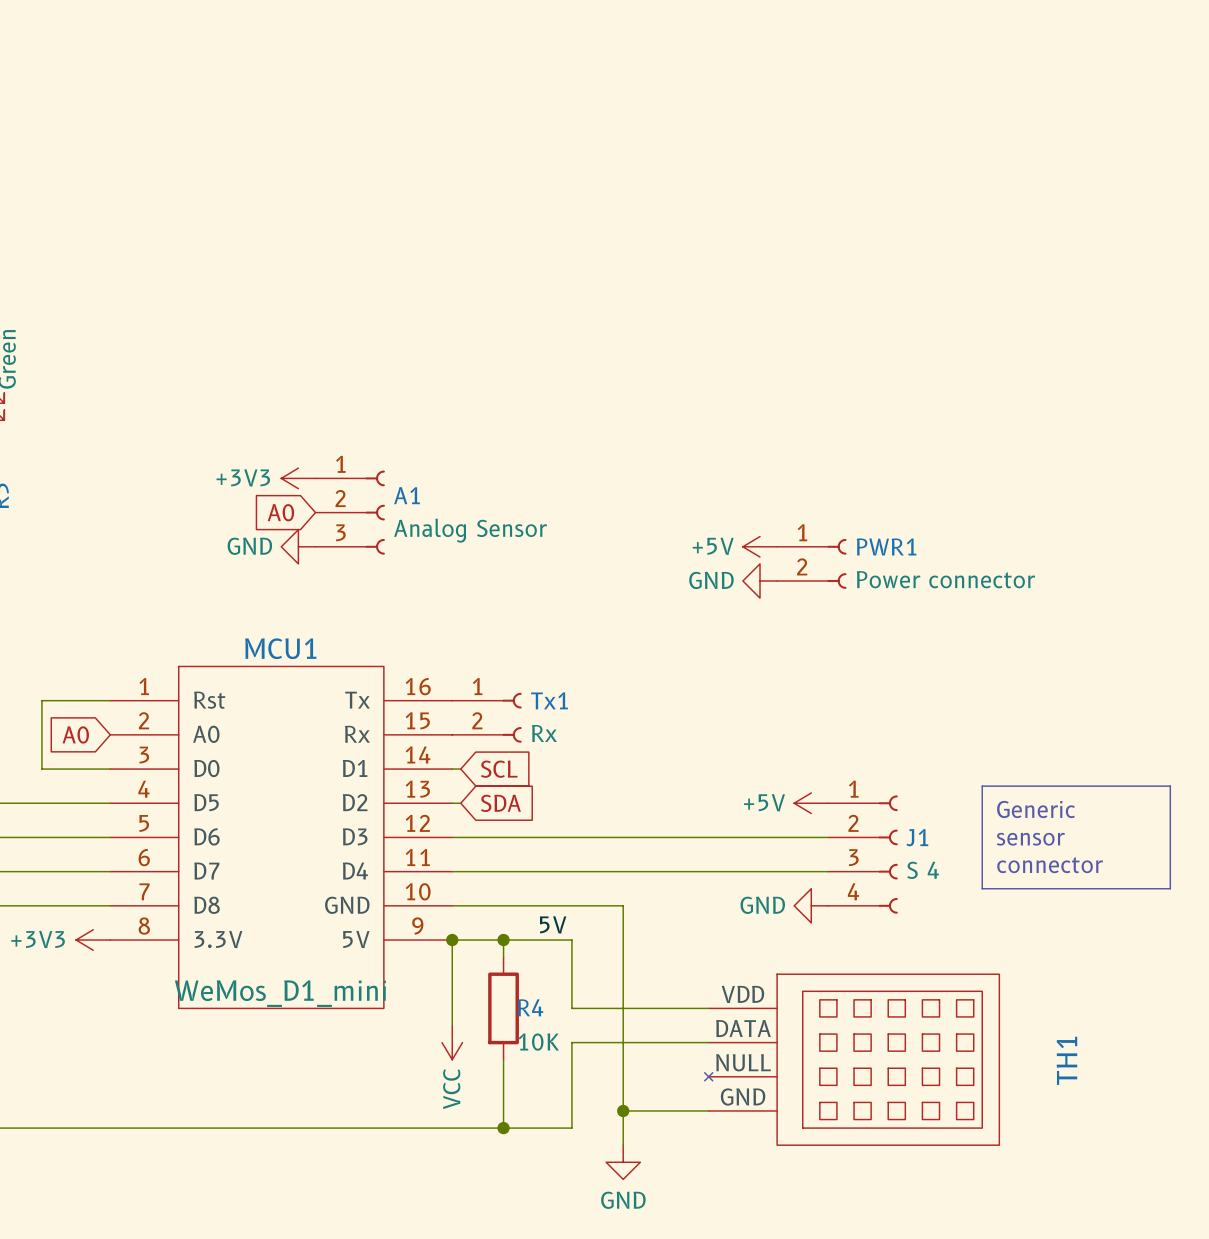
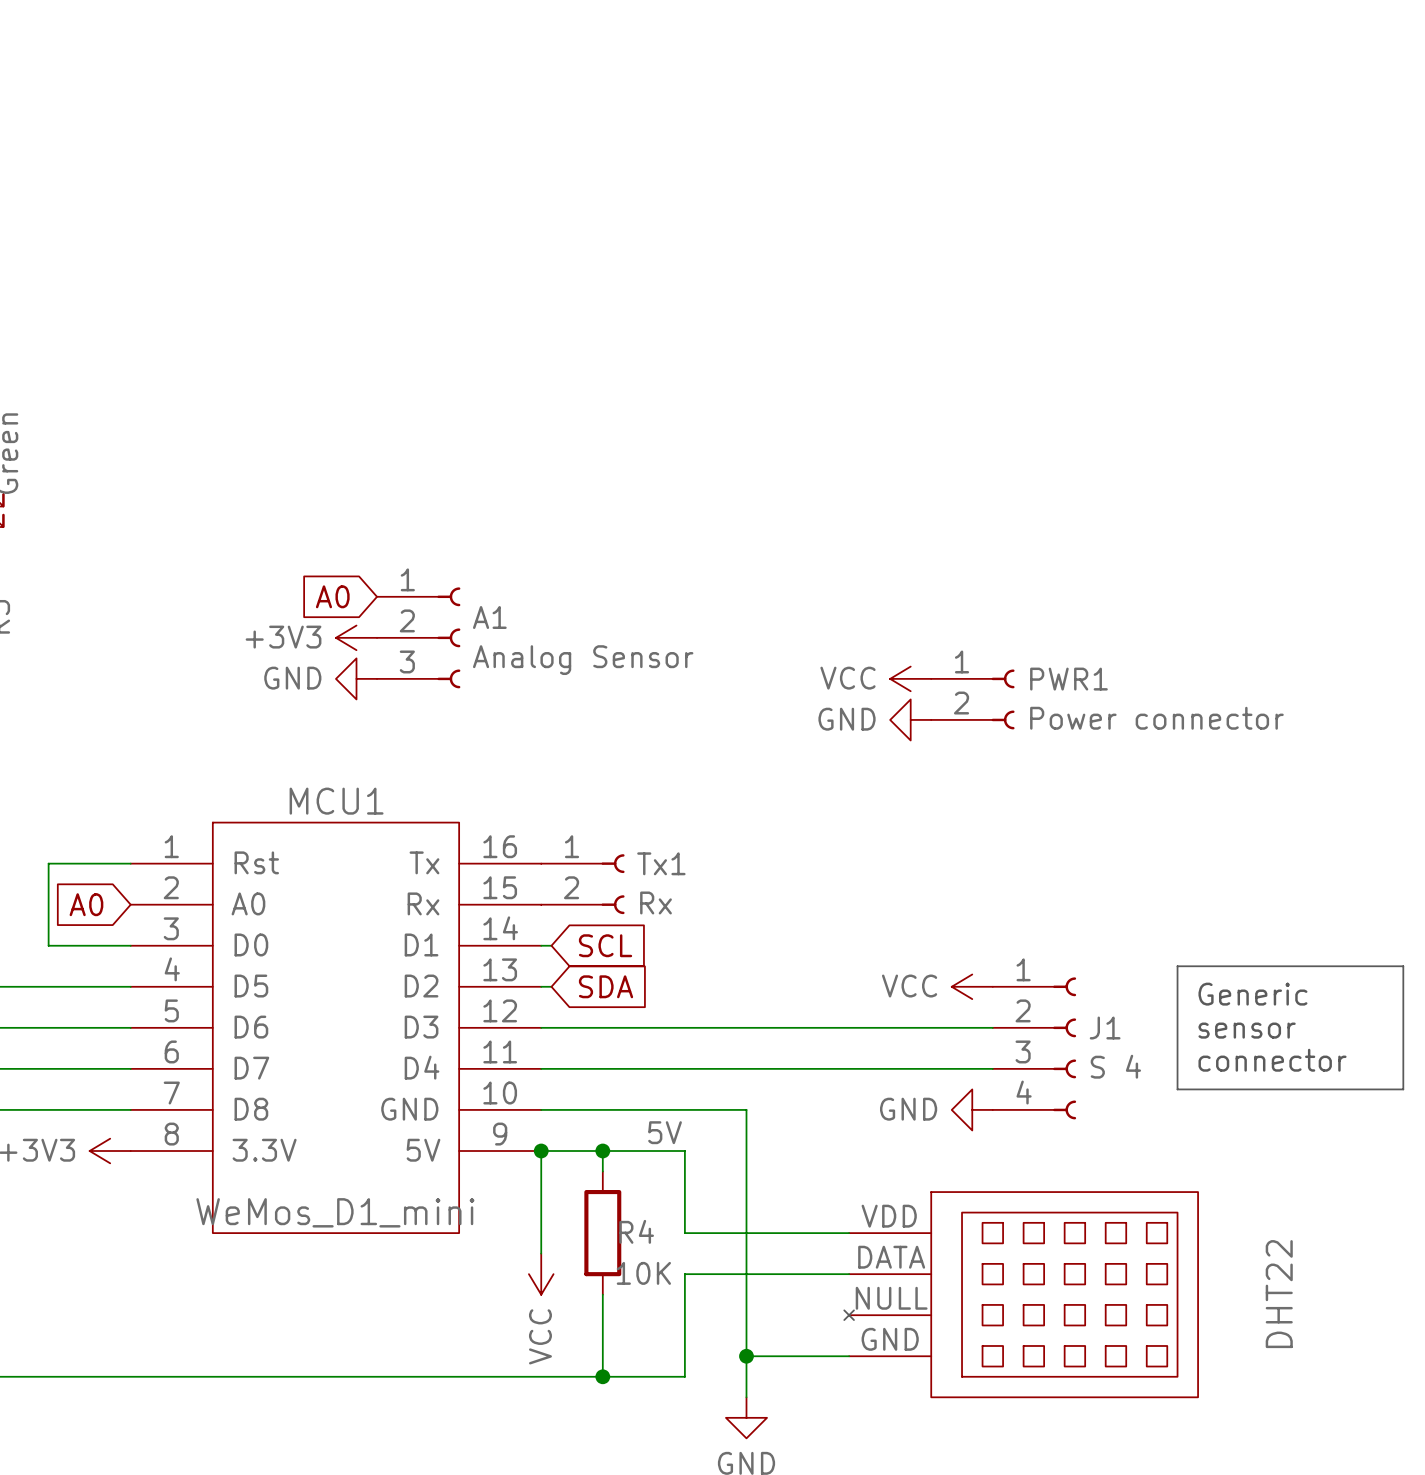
power symbol position: +3V3 (298, 478) -> +3V3 (356, 637)
global label position: A0 (280, 512) -> A0 (332, 596)
power symbol: +5V (760, 546) -> VCC (910, 678)
power symbol: +5V (811, 803) -> VCC (972, 986)
TH1 name: TH1 (1066, 1060) -> DHT22 (1279, 1294)

